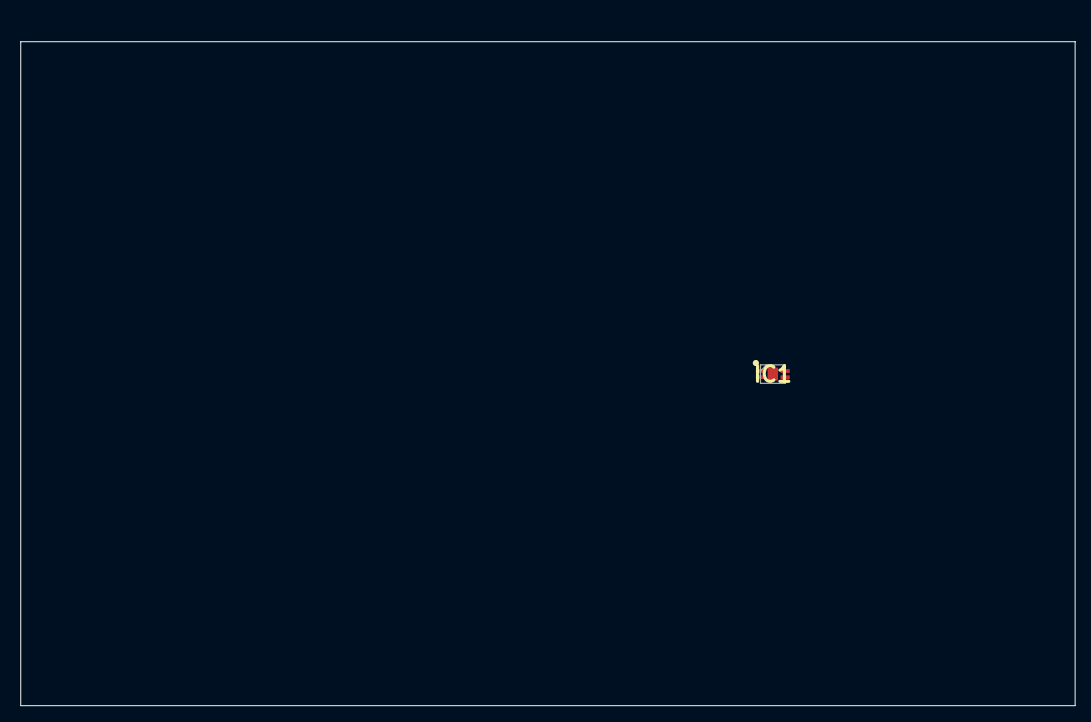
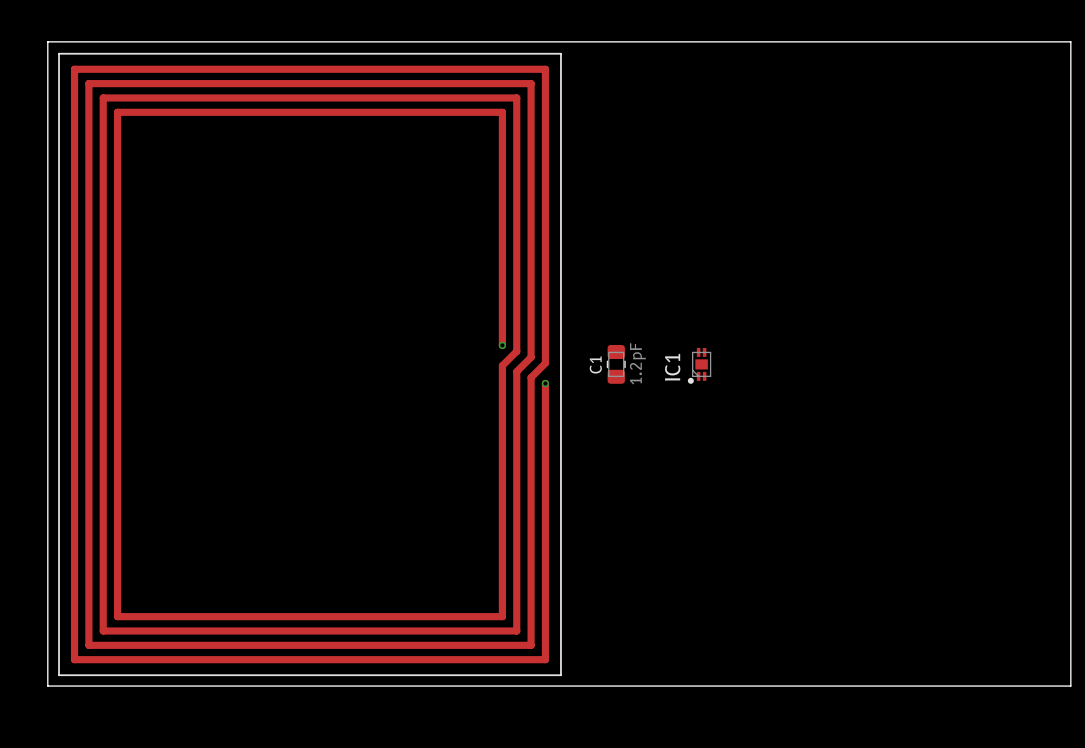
IC1 rotation: 0° (771, 371) -> 90° counterclockwise (699, 365)
IC1 position: (771, 371) -> (699, 365)
IC1 name position: IC1 (773, 373) -> IC1 (672, 367)
part: none -> (309, 364)
C1: none -> 1.2pF (616, 364)

